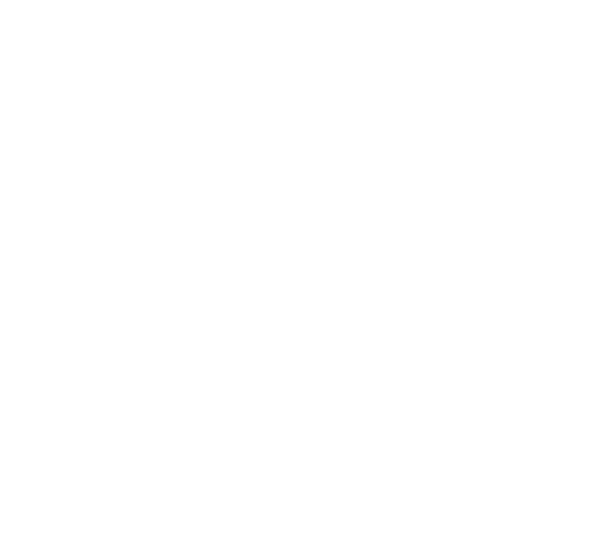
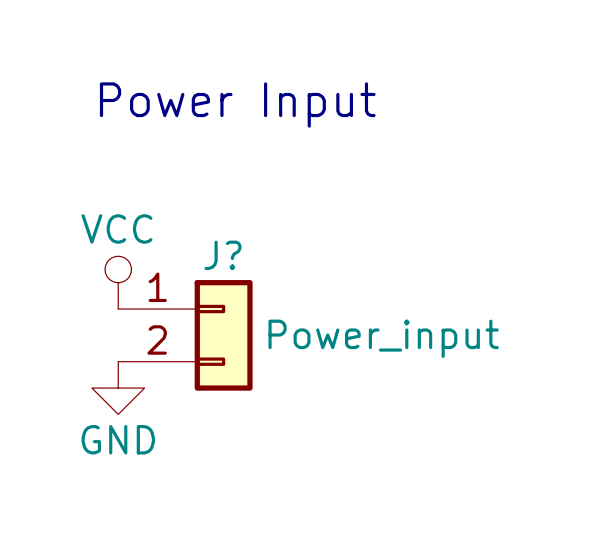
text: none -> Power Input (237, 105)
power symbol: none -> VCC (118, 282)
J?: none -> Power_input (185, 335)
power symbol: none -> GND (118, 388)

